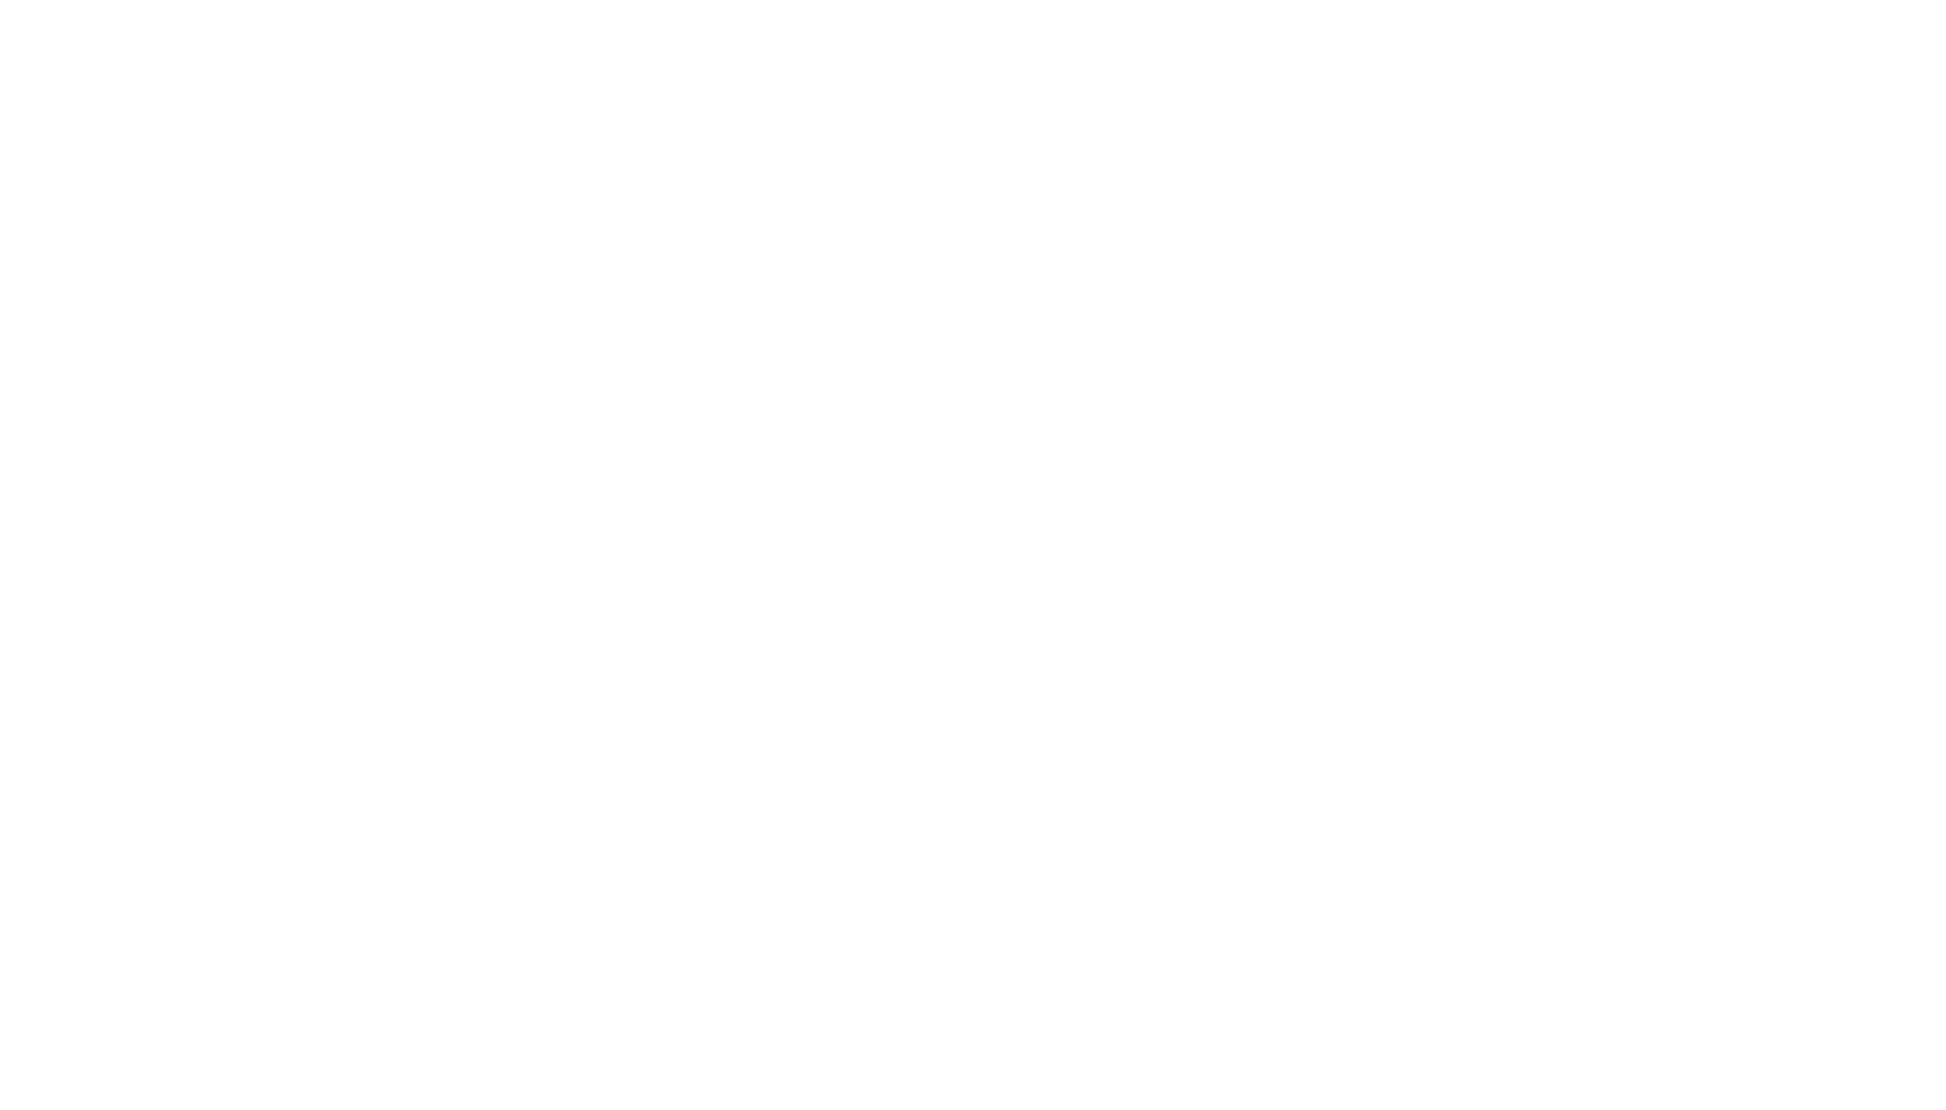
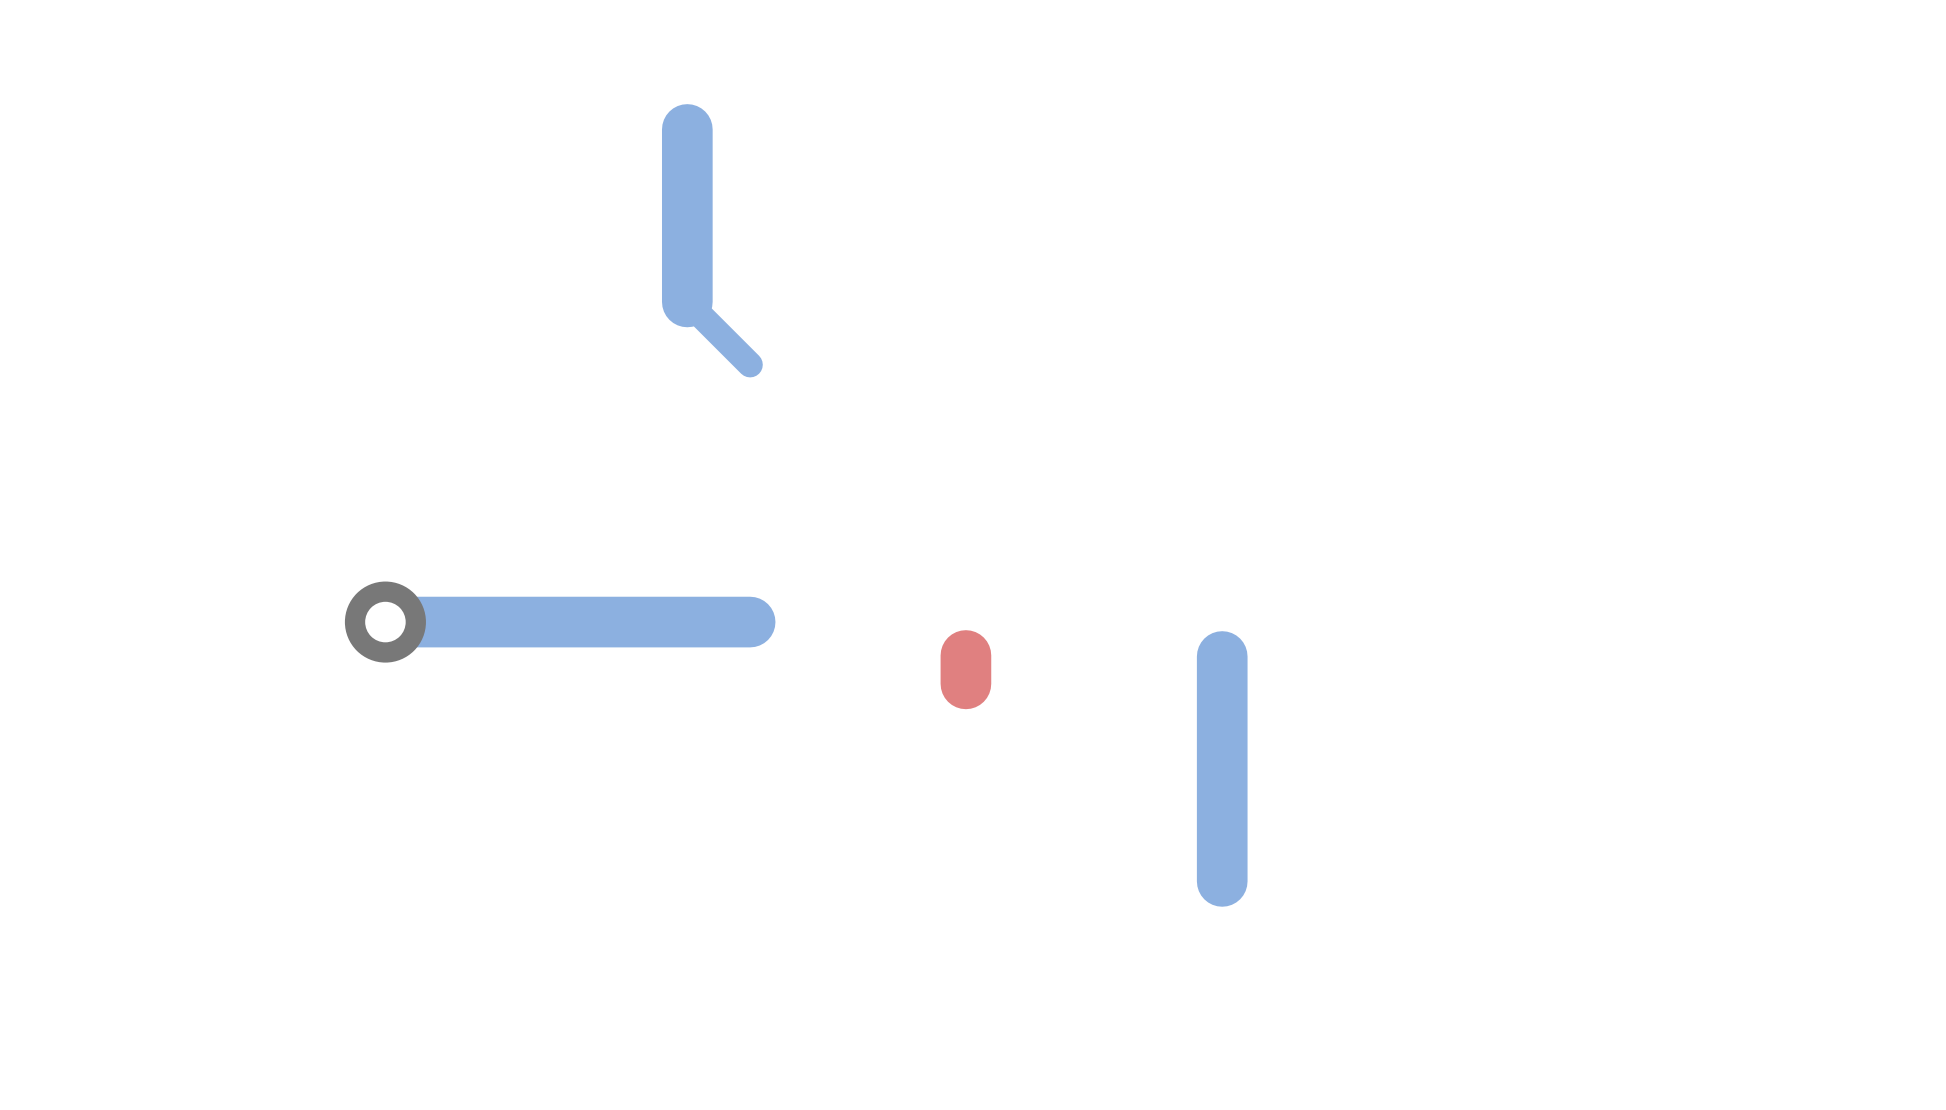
bottom track: none -> (687, 129) (687, 301) (750, 364)
bottom track: none -> (385, 622) (750, 622)
via: none -> (385, 622)
top track: none -> (965, 655) (965, 683)
bottom track: none -> (1222, 656) (1222, 881)

